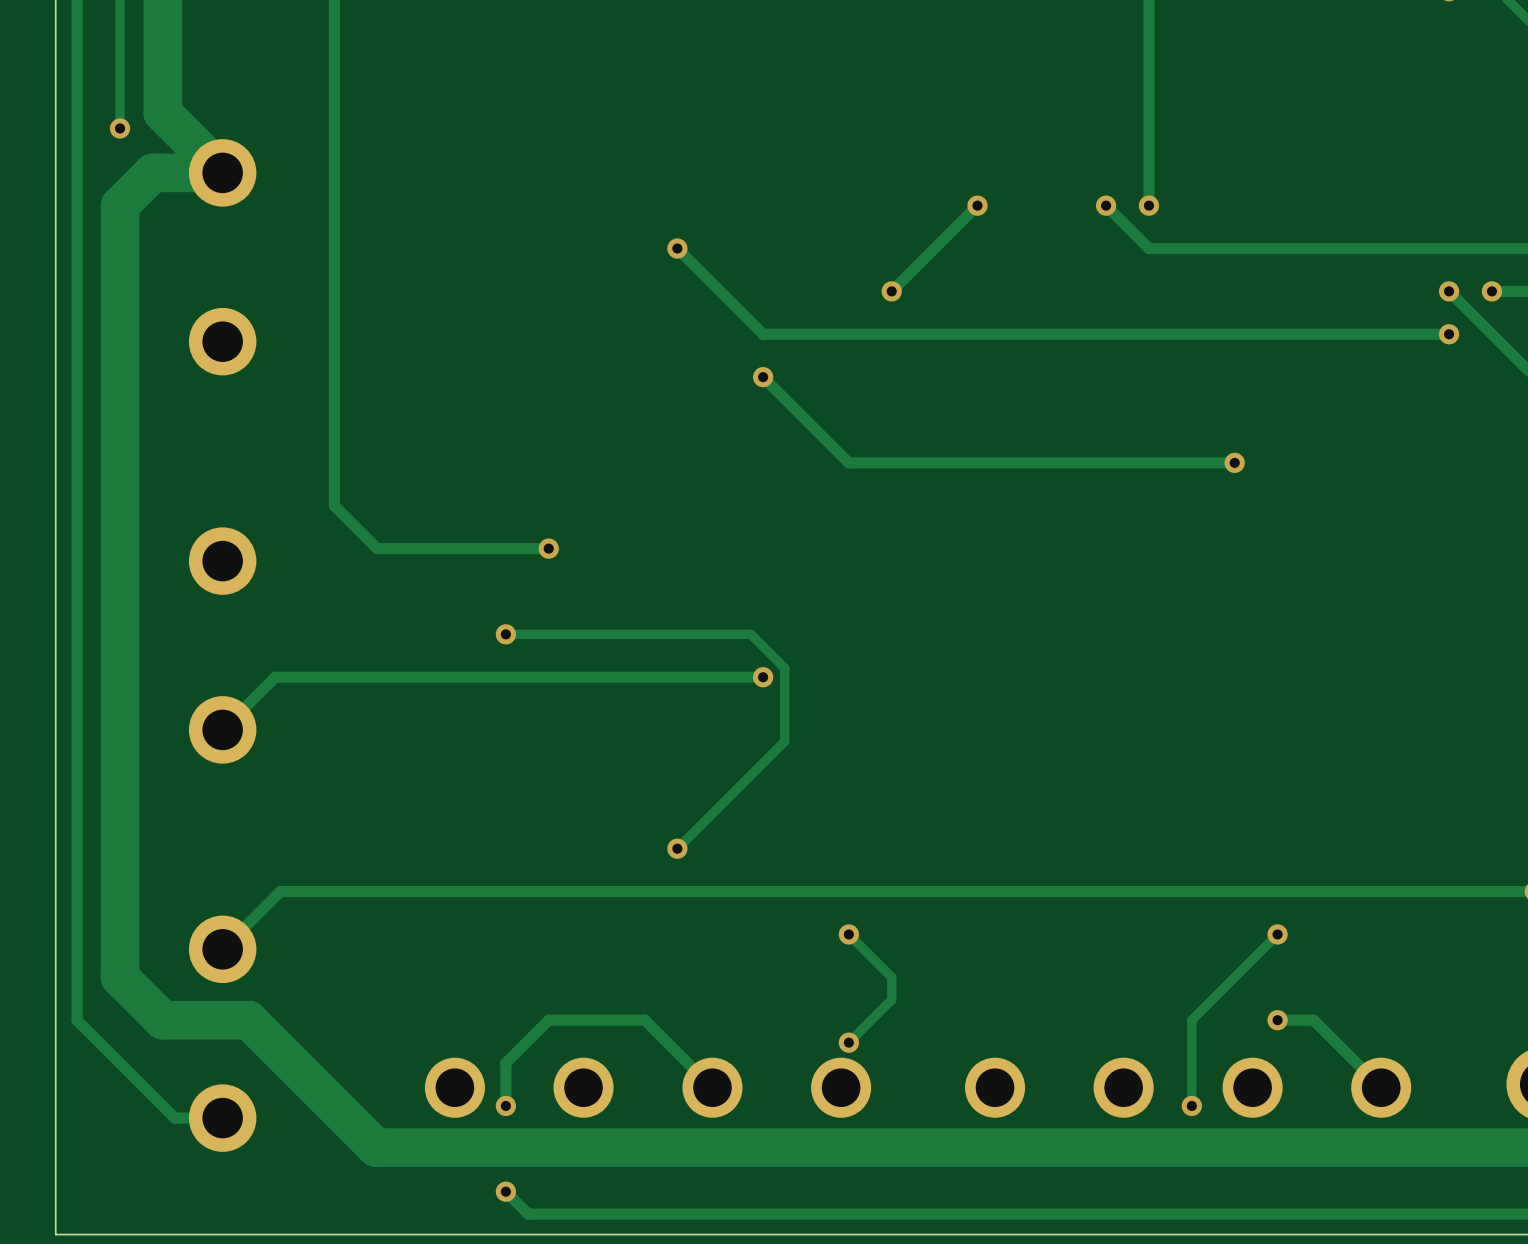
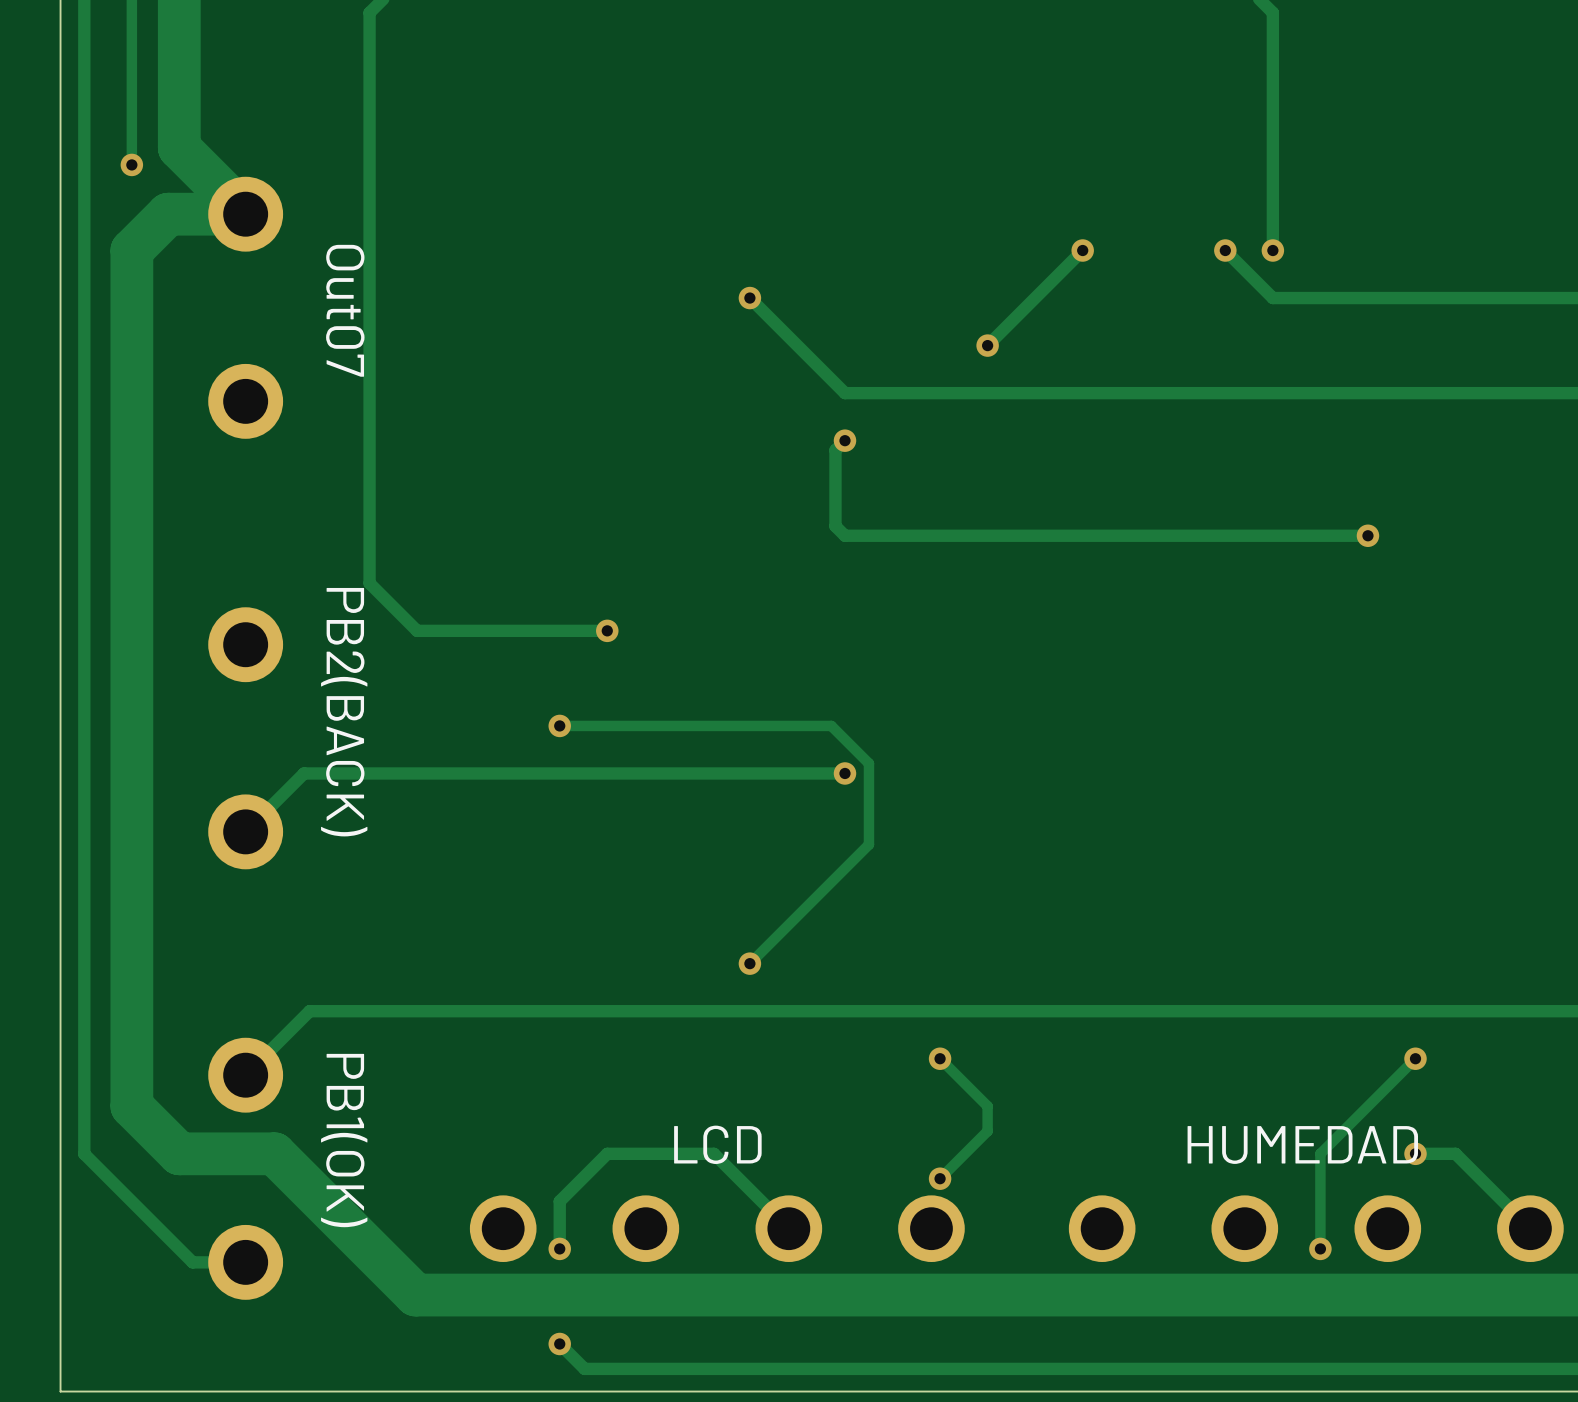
text: none -> Out07 (345, 310)
track: (763, 377) (848, 462) -> (844, 440) (835, 450) (835, 526) (844, 535) (940, 535)
text: none -> PB2(BACK) (344, 712)
text: none -> PB1(OK) (344, 1140)
text: none -> LCD (717, 1144)
text: none -> HUMEDAD (1302, 1144)

